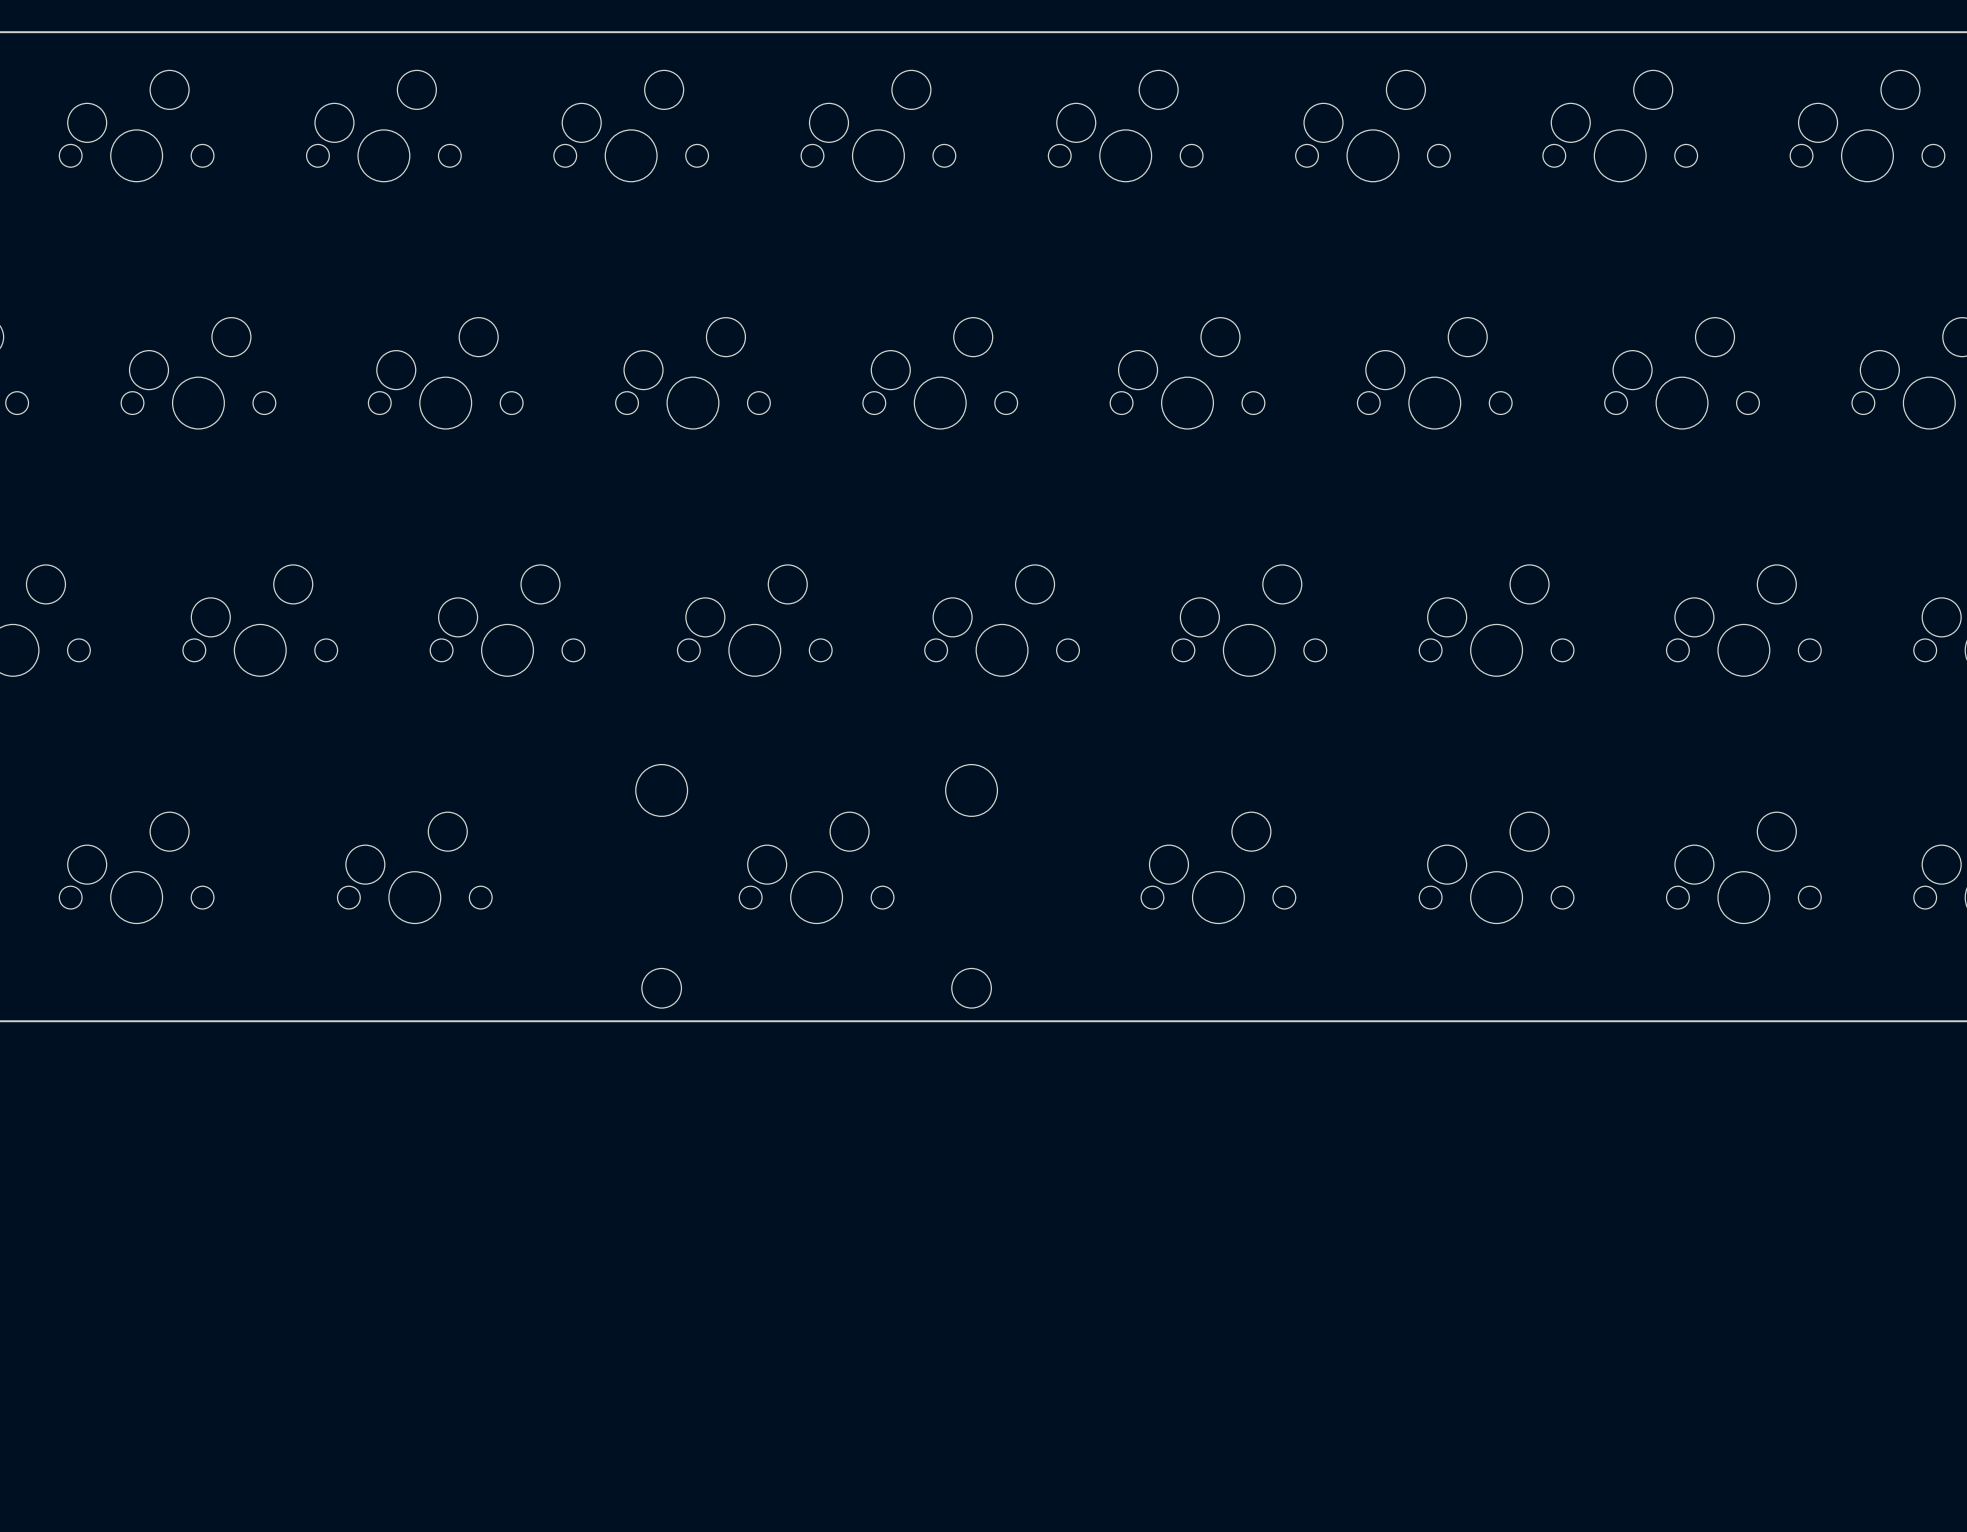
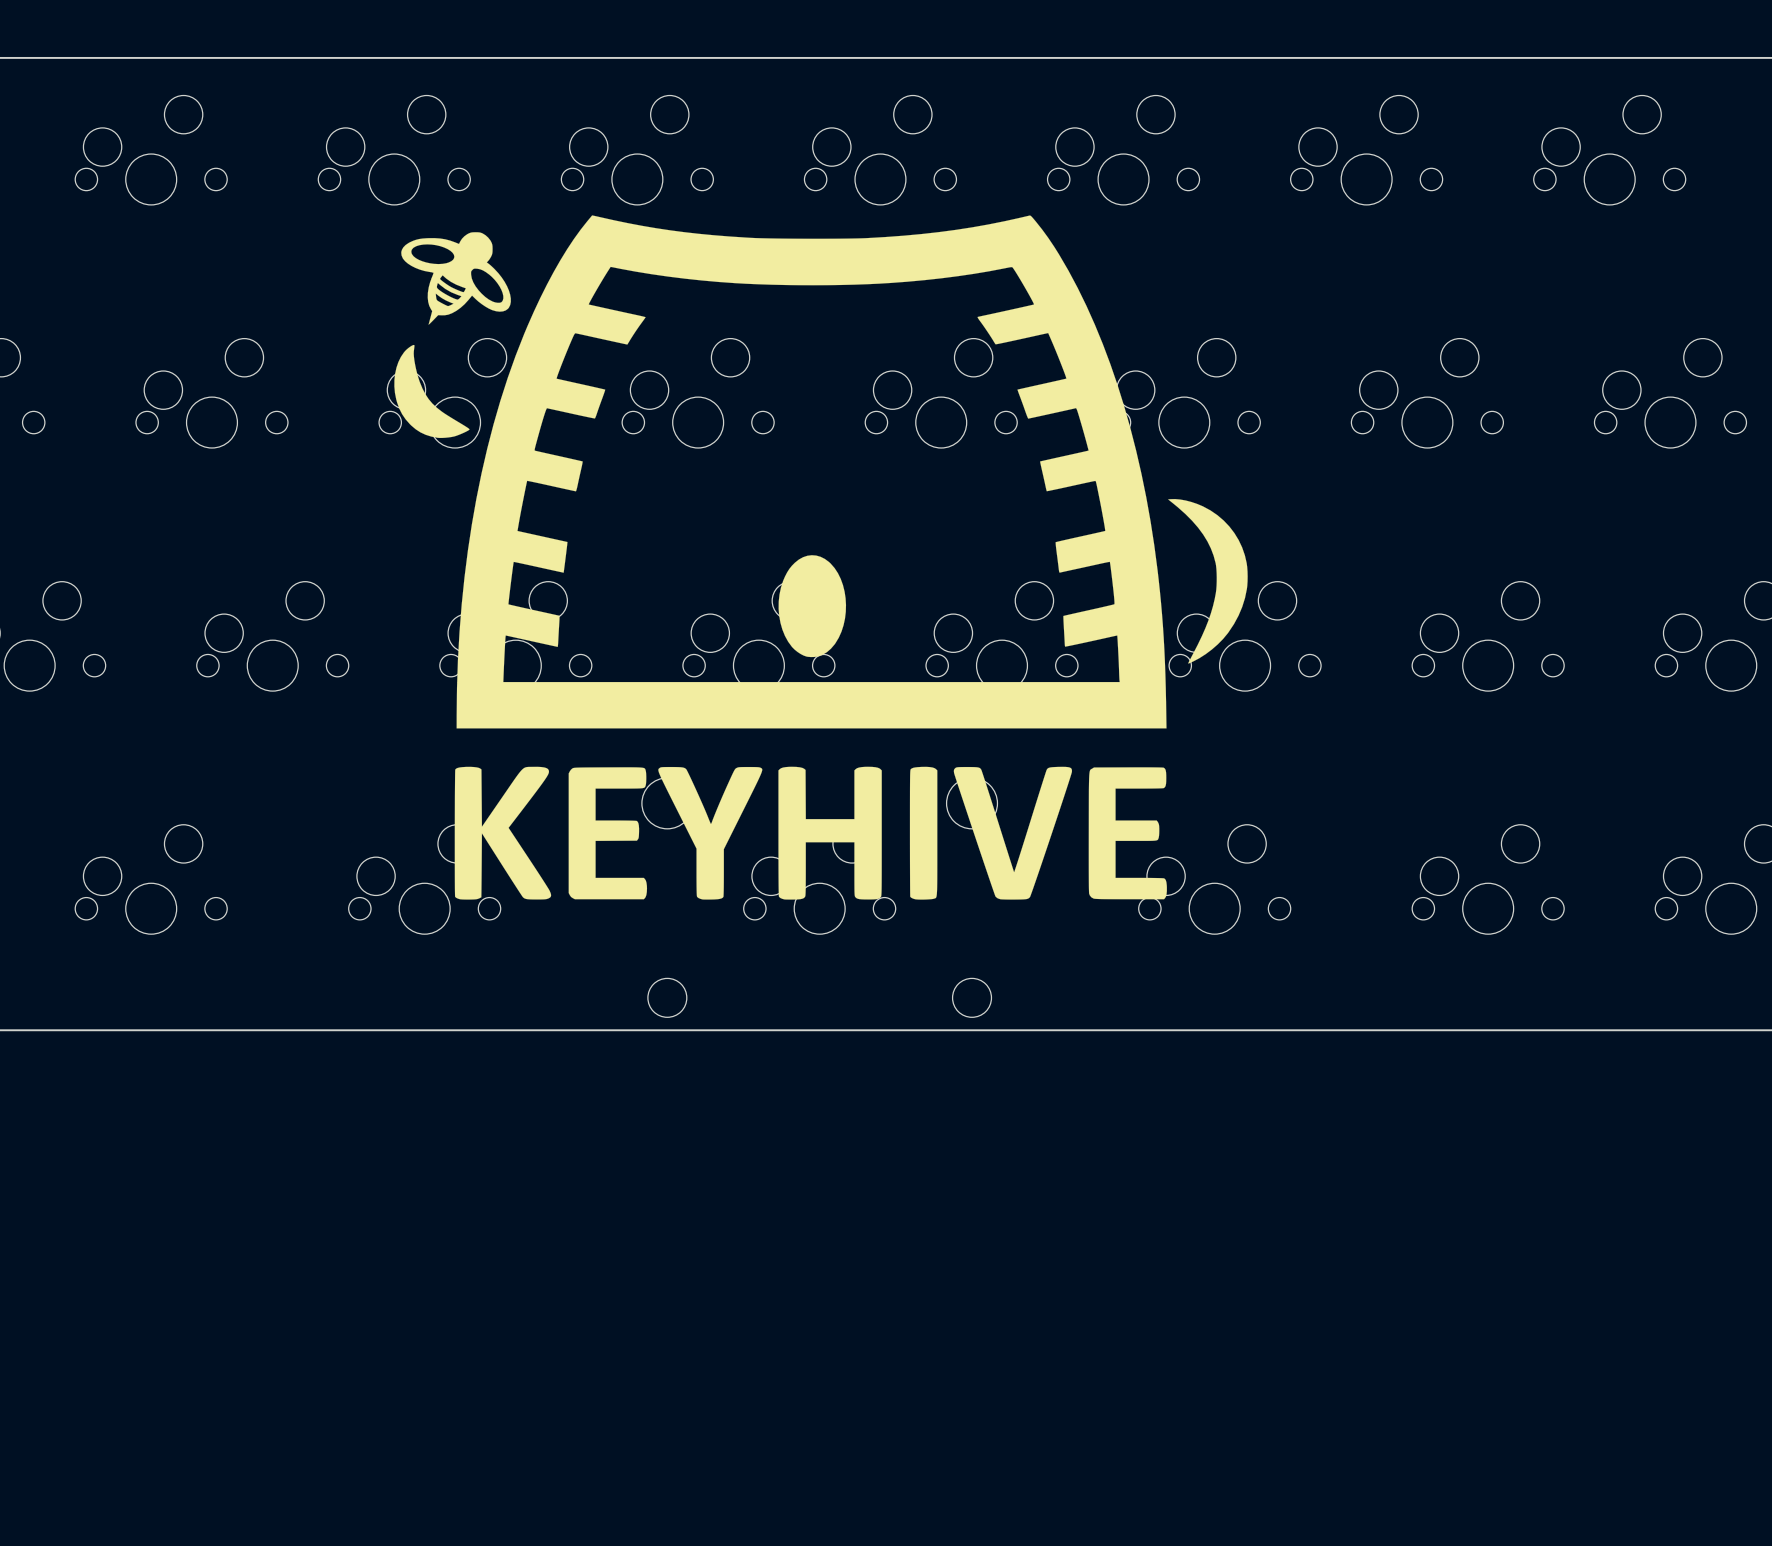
drawing: none -> [394, 215, 1248, 900]

